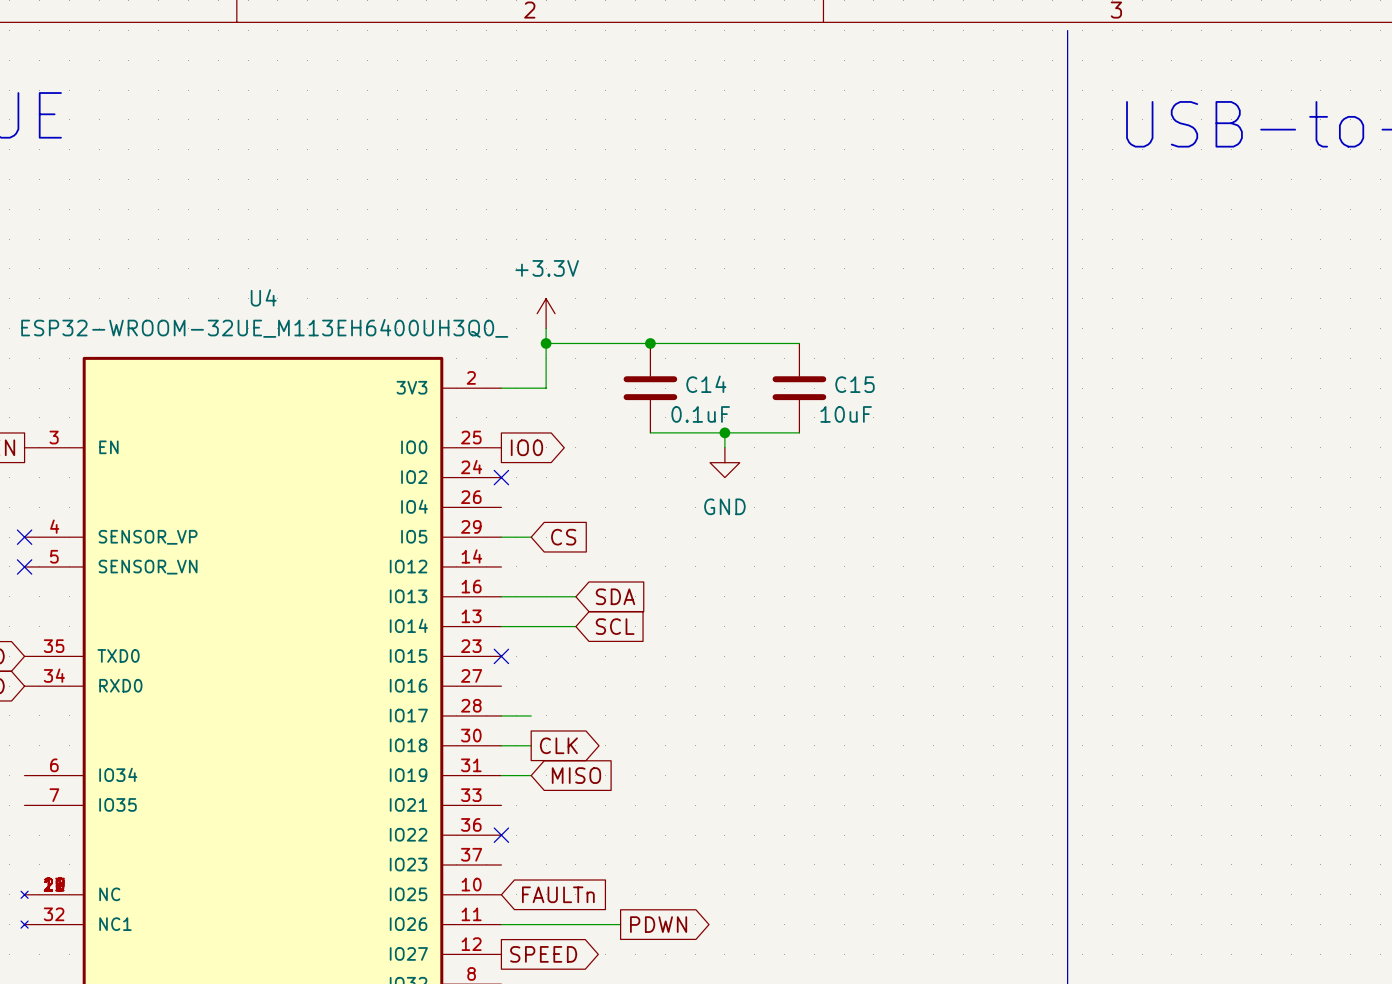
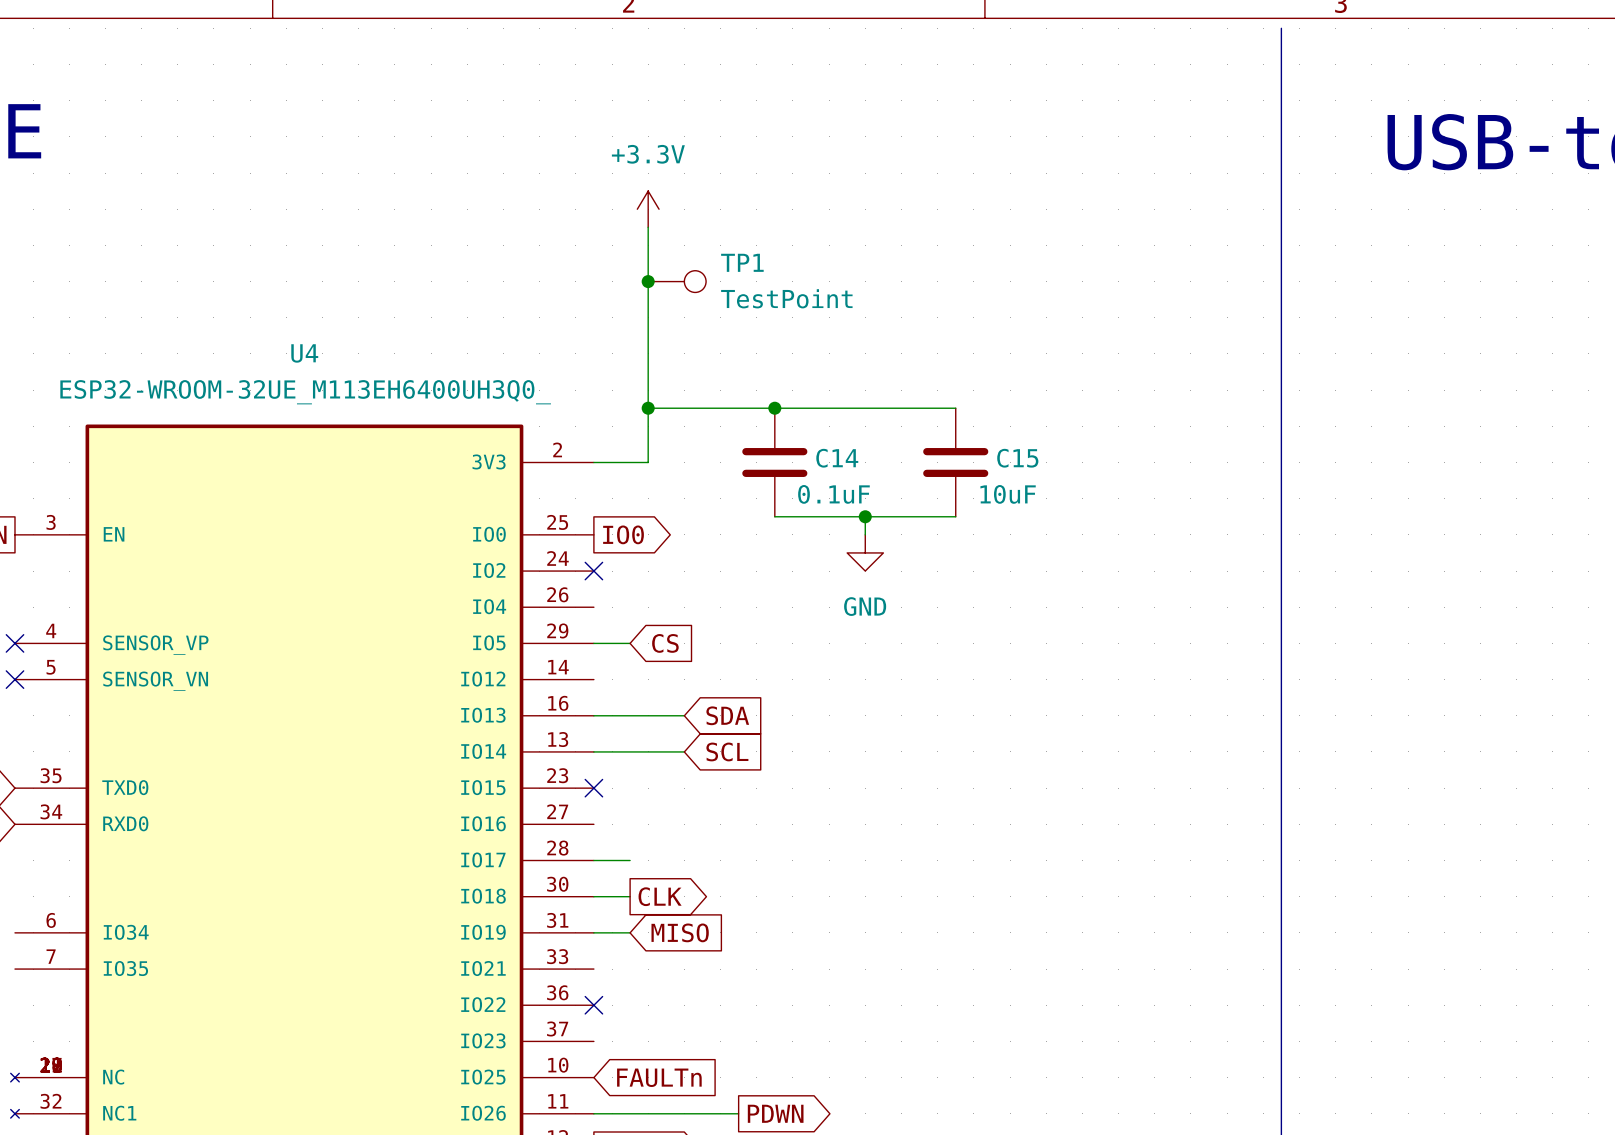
wire: none -> (648, 227) (648, 390)
junction: none -> (648, 281)
TP1: none -> TestPoint (677, 281)
power symbol position: +3.3V (546, 313) -> +3.3V (648, 209)

